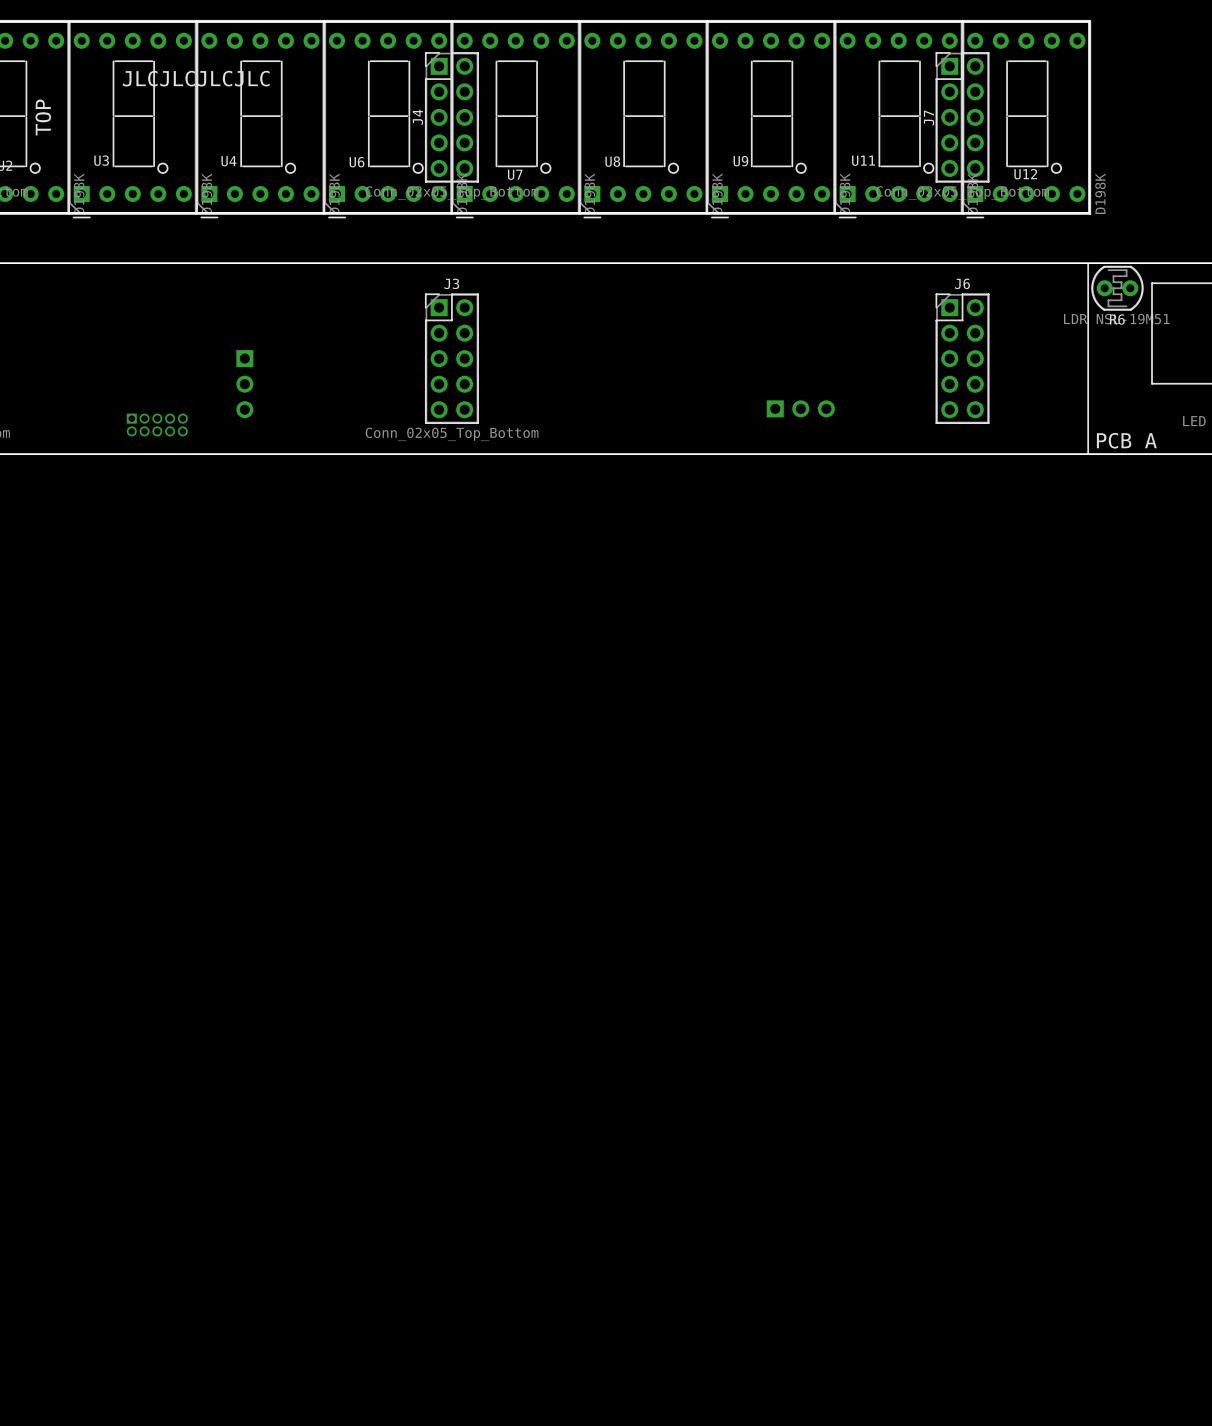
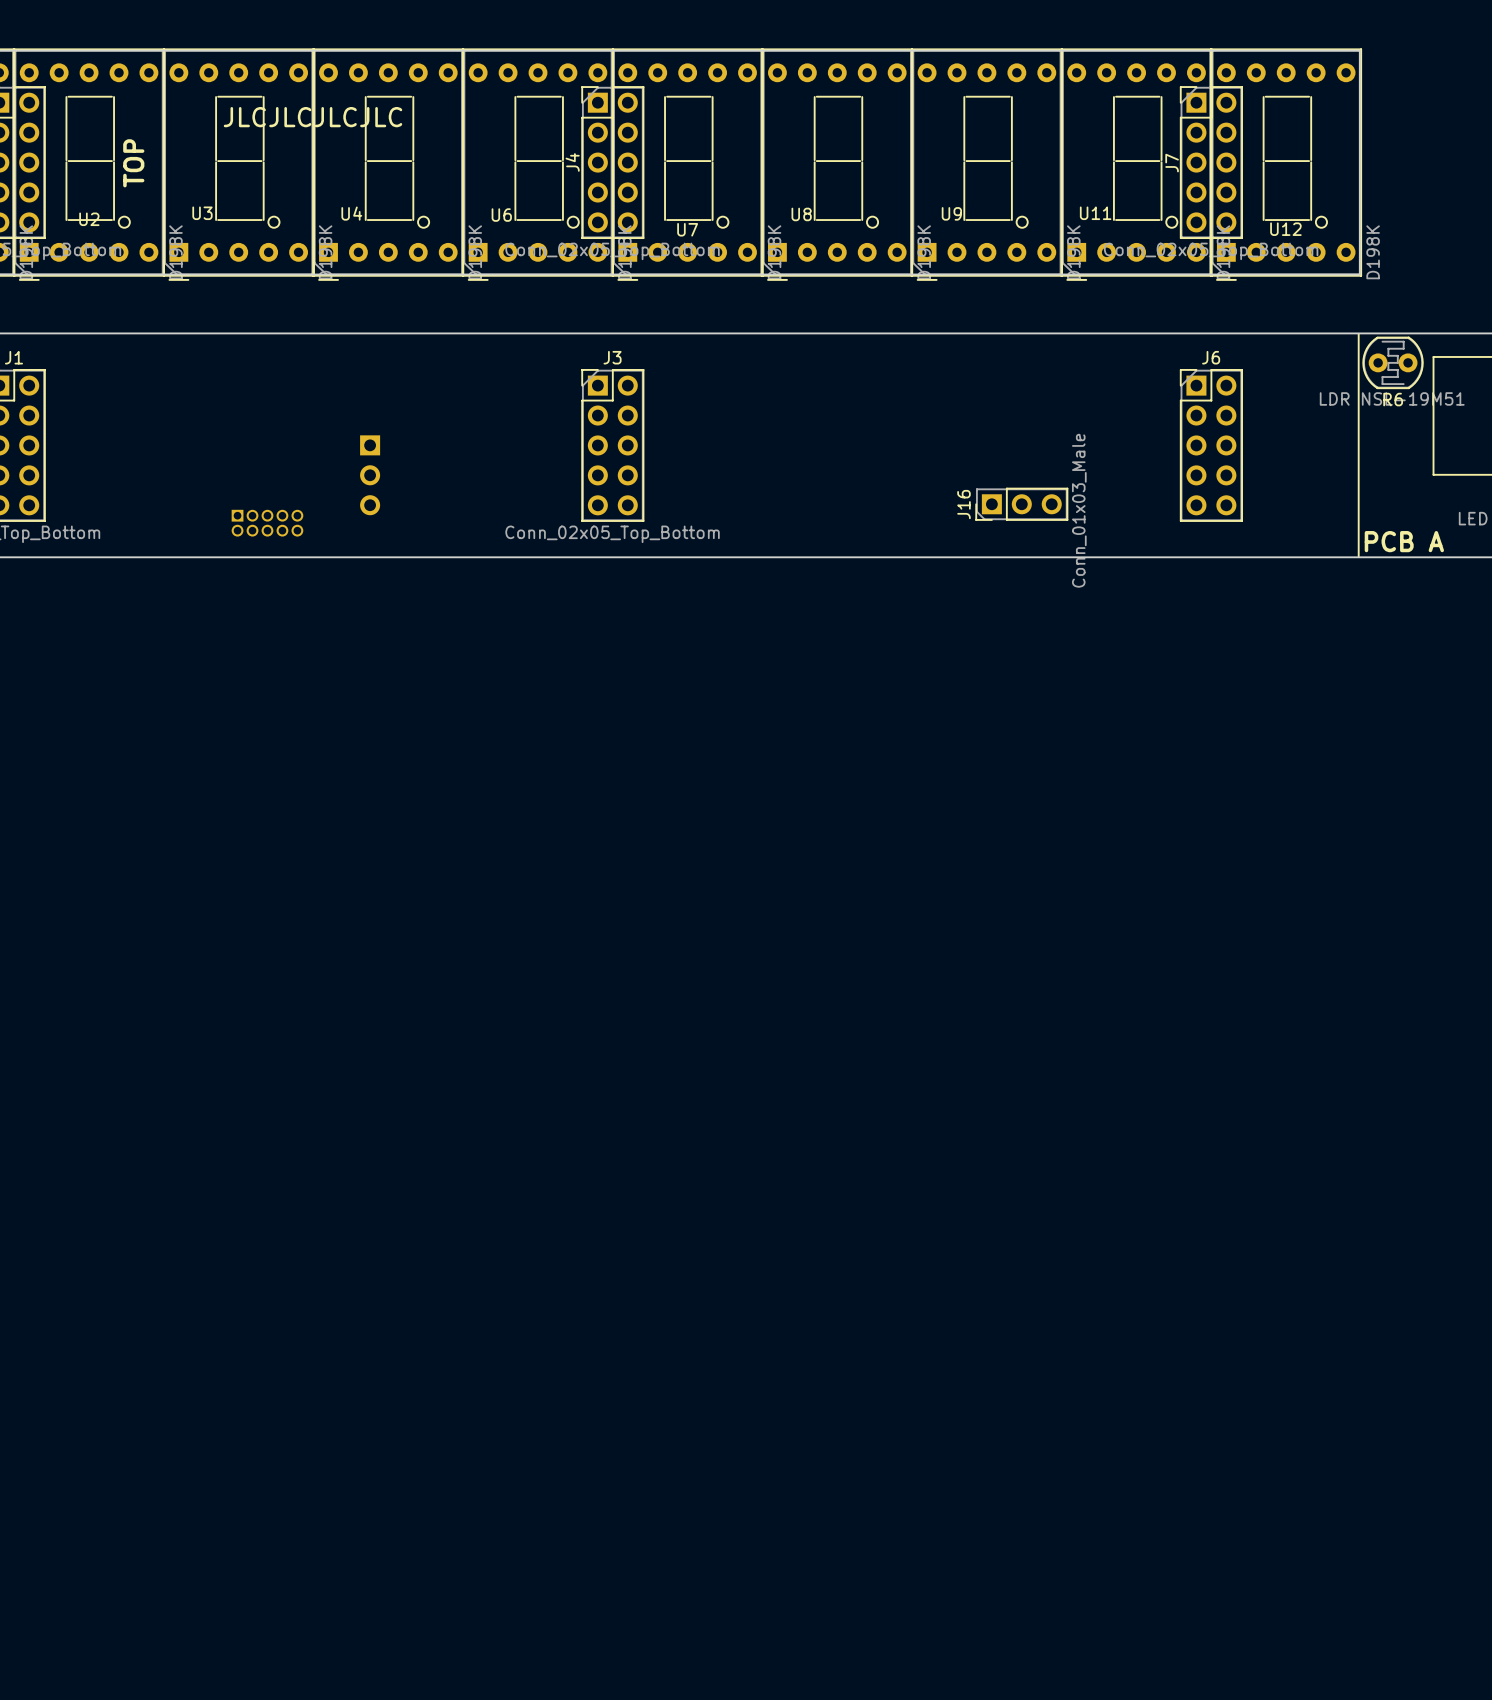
J16 side: bottom (800, 408) -> top (1021, 504)

